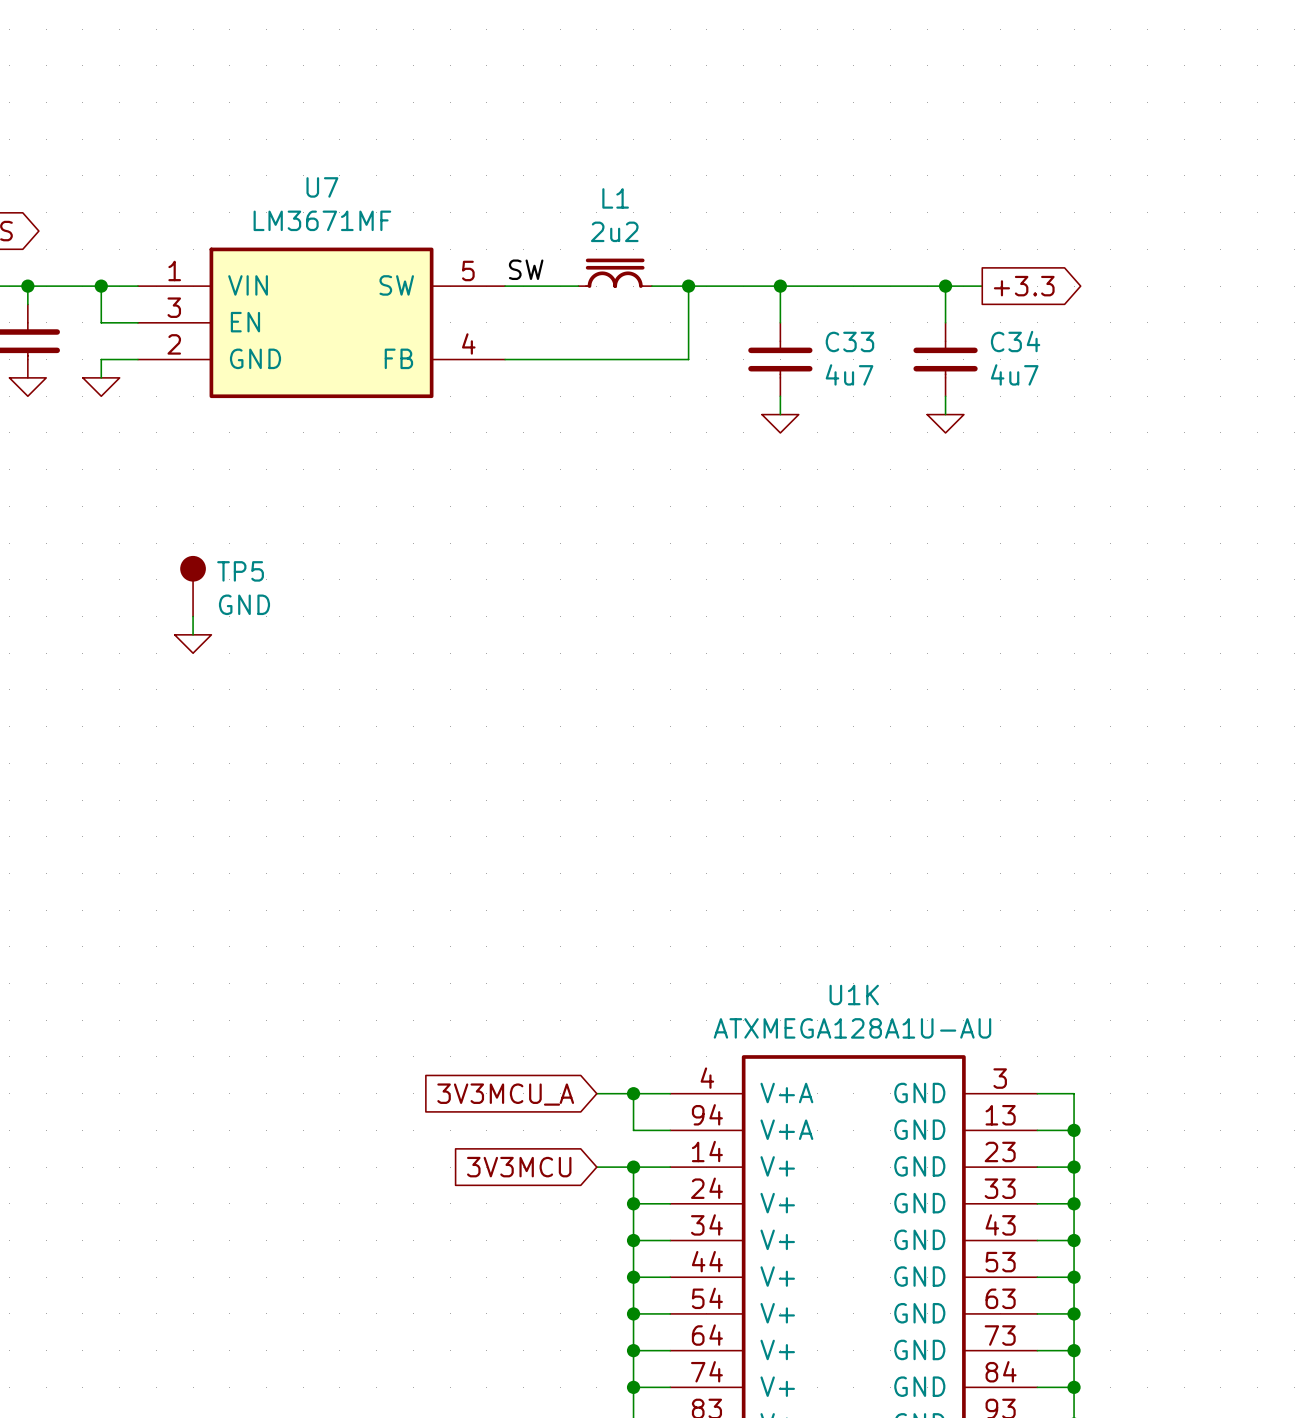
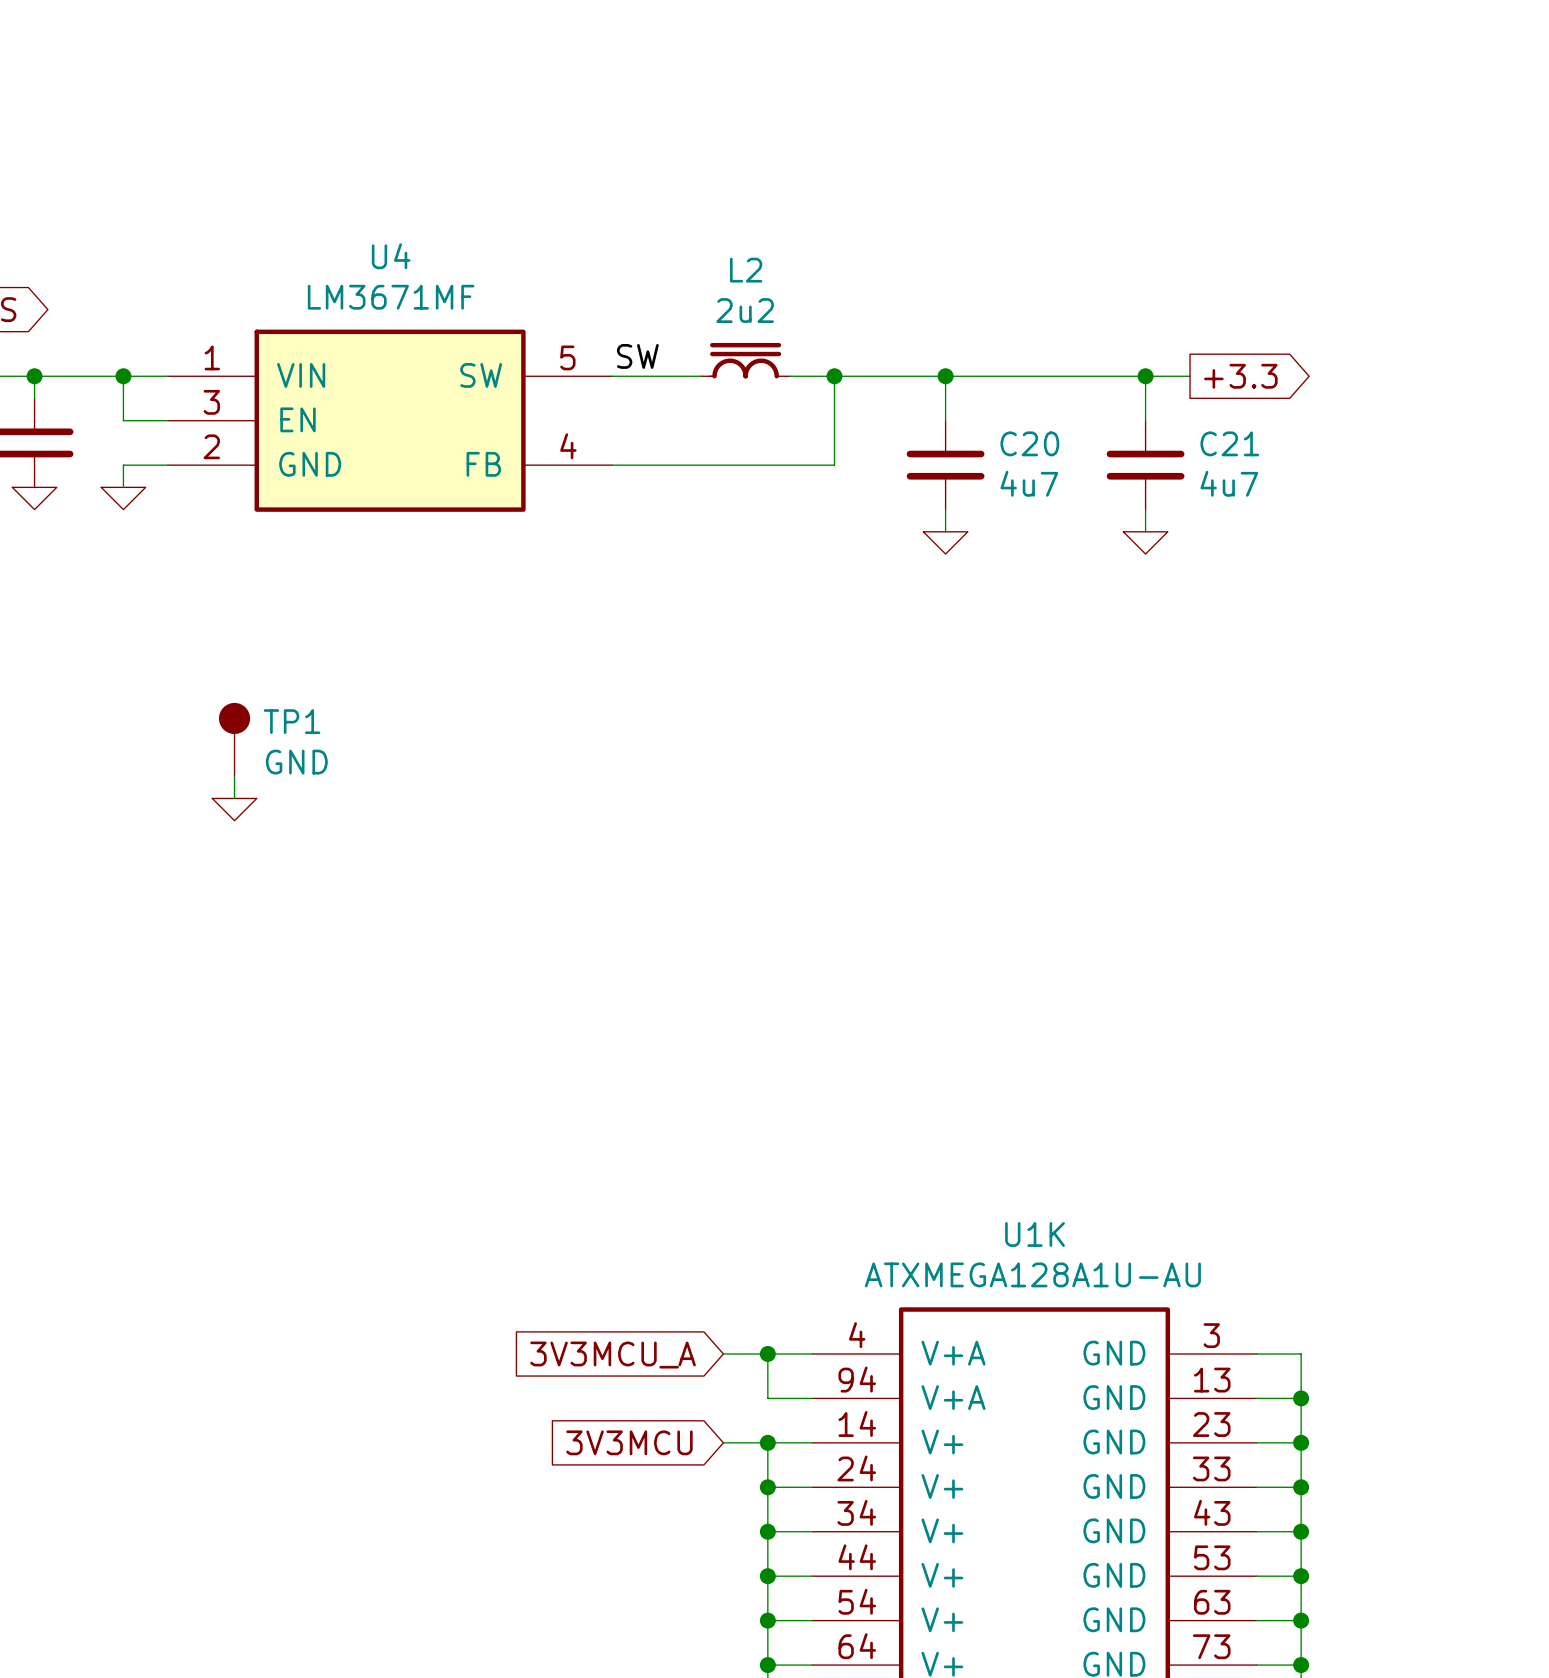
U7 name: U7 (322, 187) -> U4 (391, 256)
L1 name: L1 (615, 198) -> L2 (746, 270)
C33 name: C33 (849, 341) -> C20 (1029, 443)
C34 name: C34 (1015, 341) -> C21 (1229, 443)
TP5 name: TP5 (240, 571) -> TP1 (292, 721)

